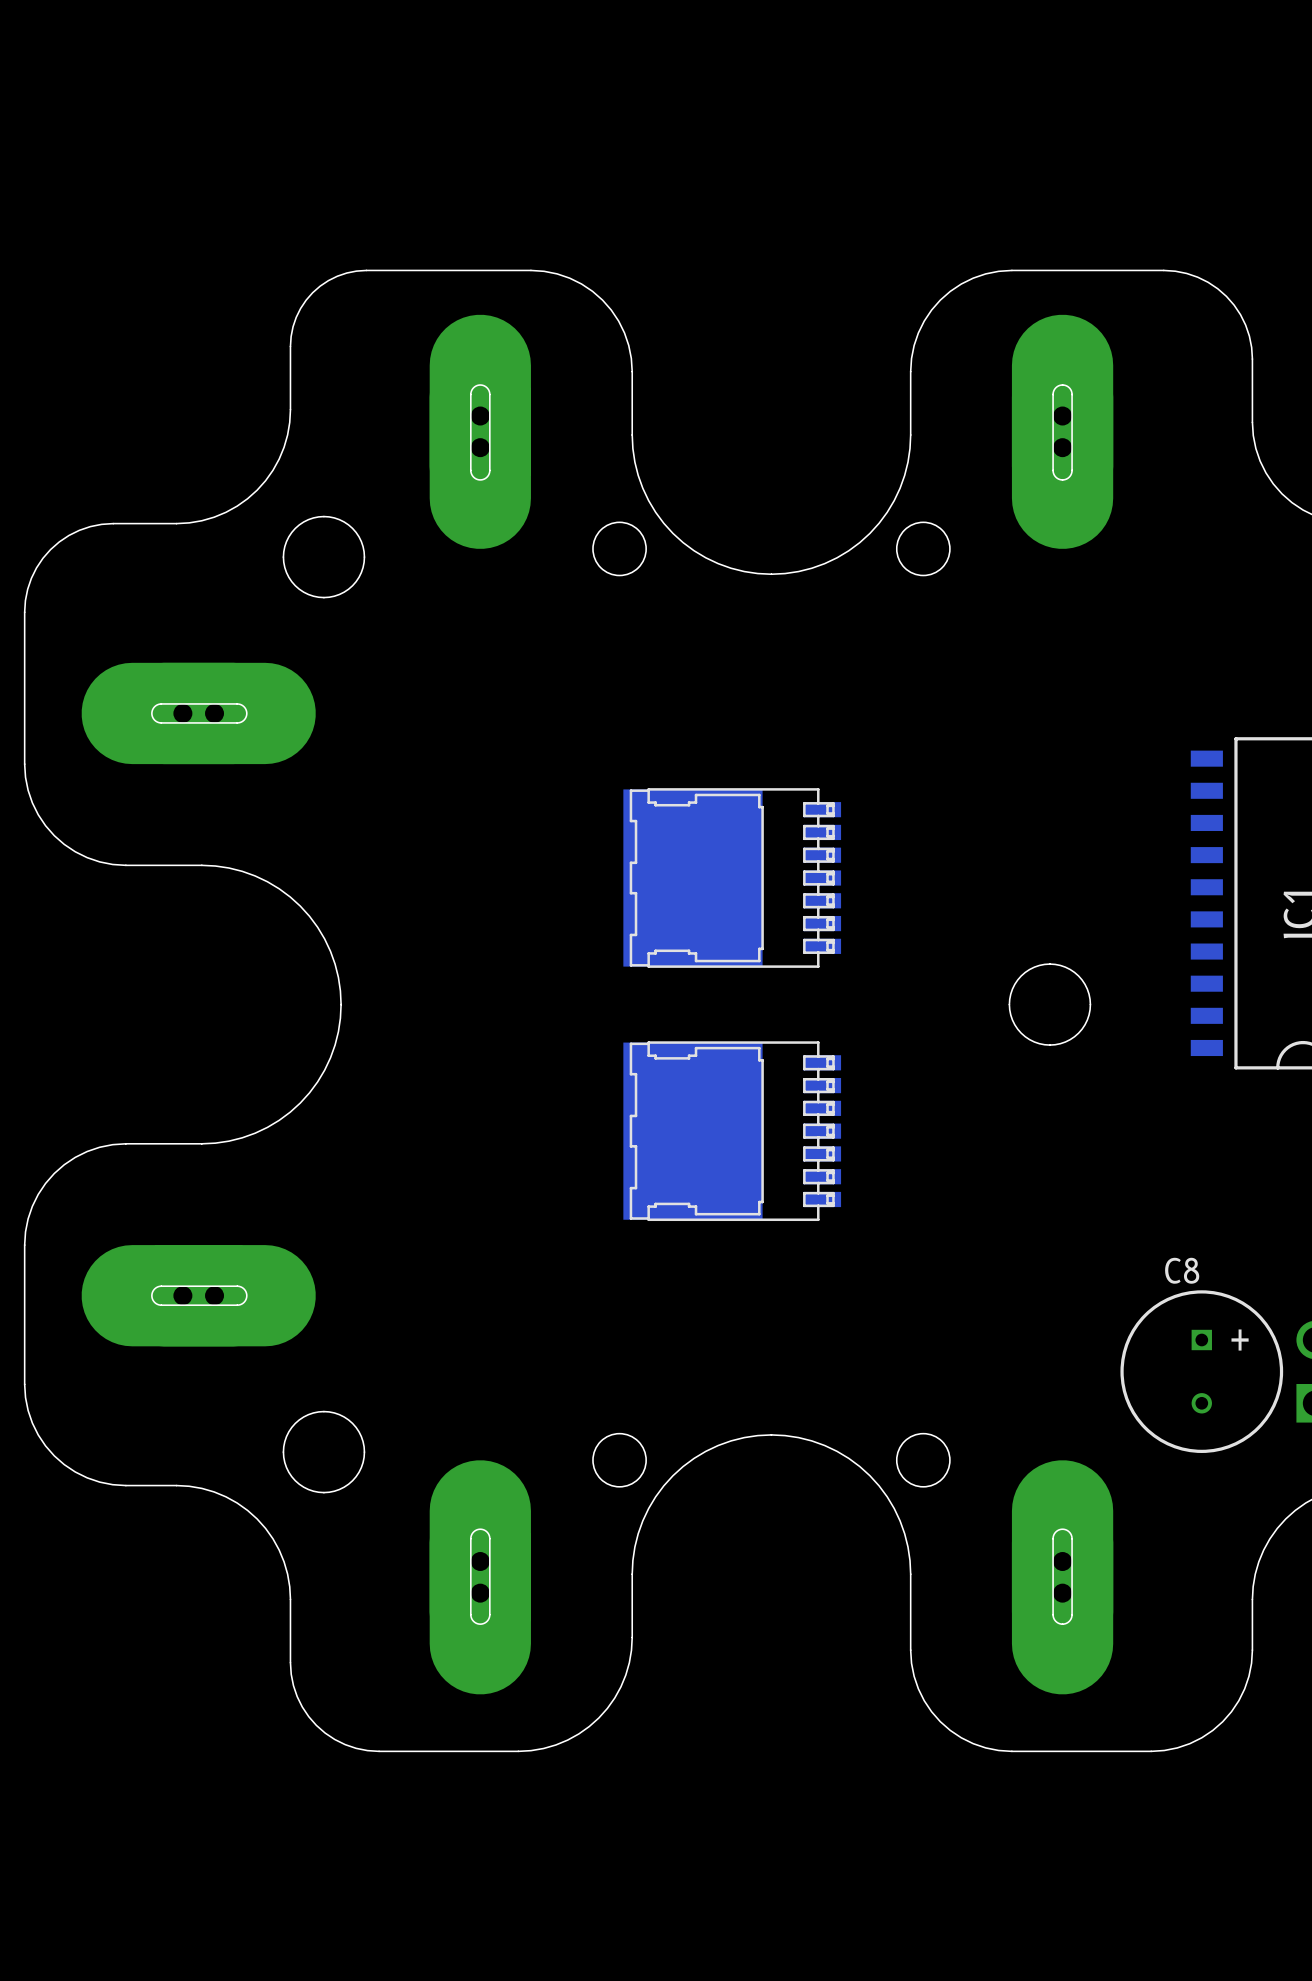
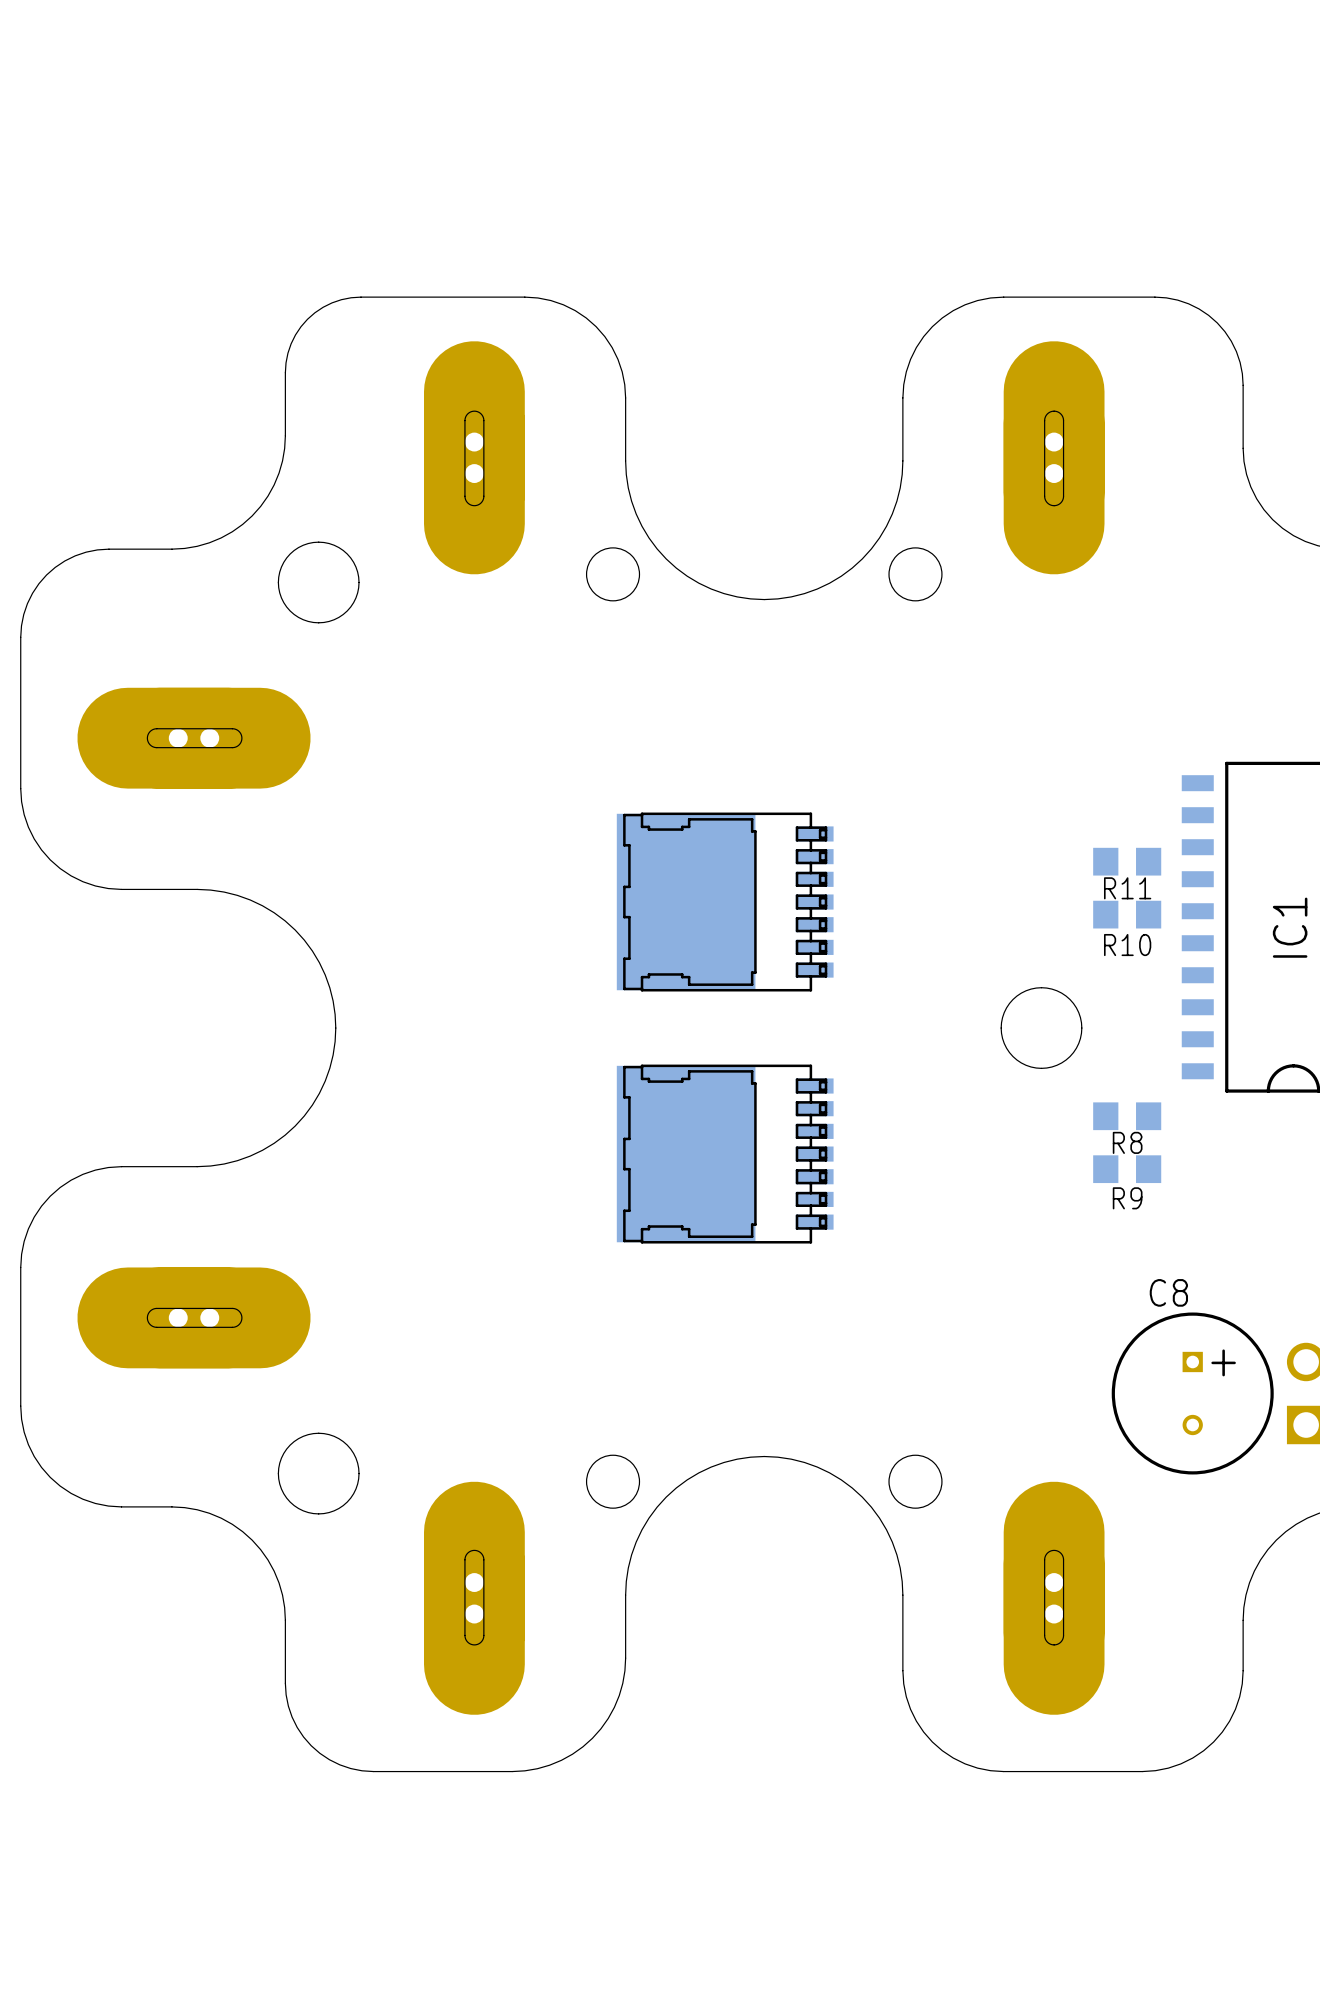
R11: none -> (1127, 861)
R10: none -> (1127, 914)
R8: none -> (1127, 1116)
R9: none -> (1127, 1169)

